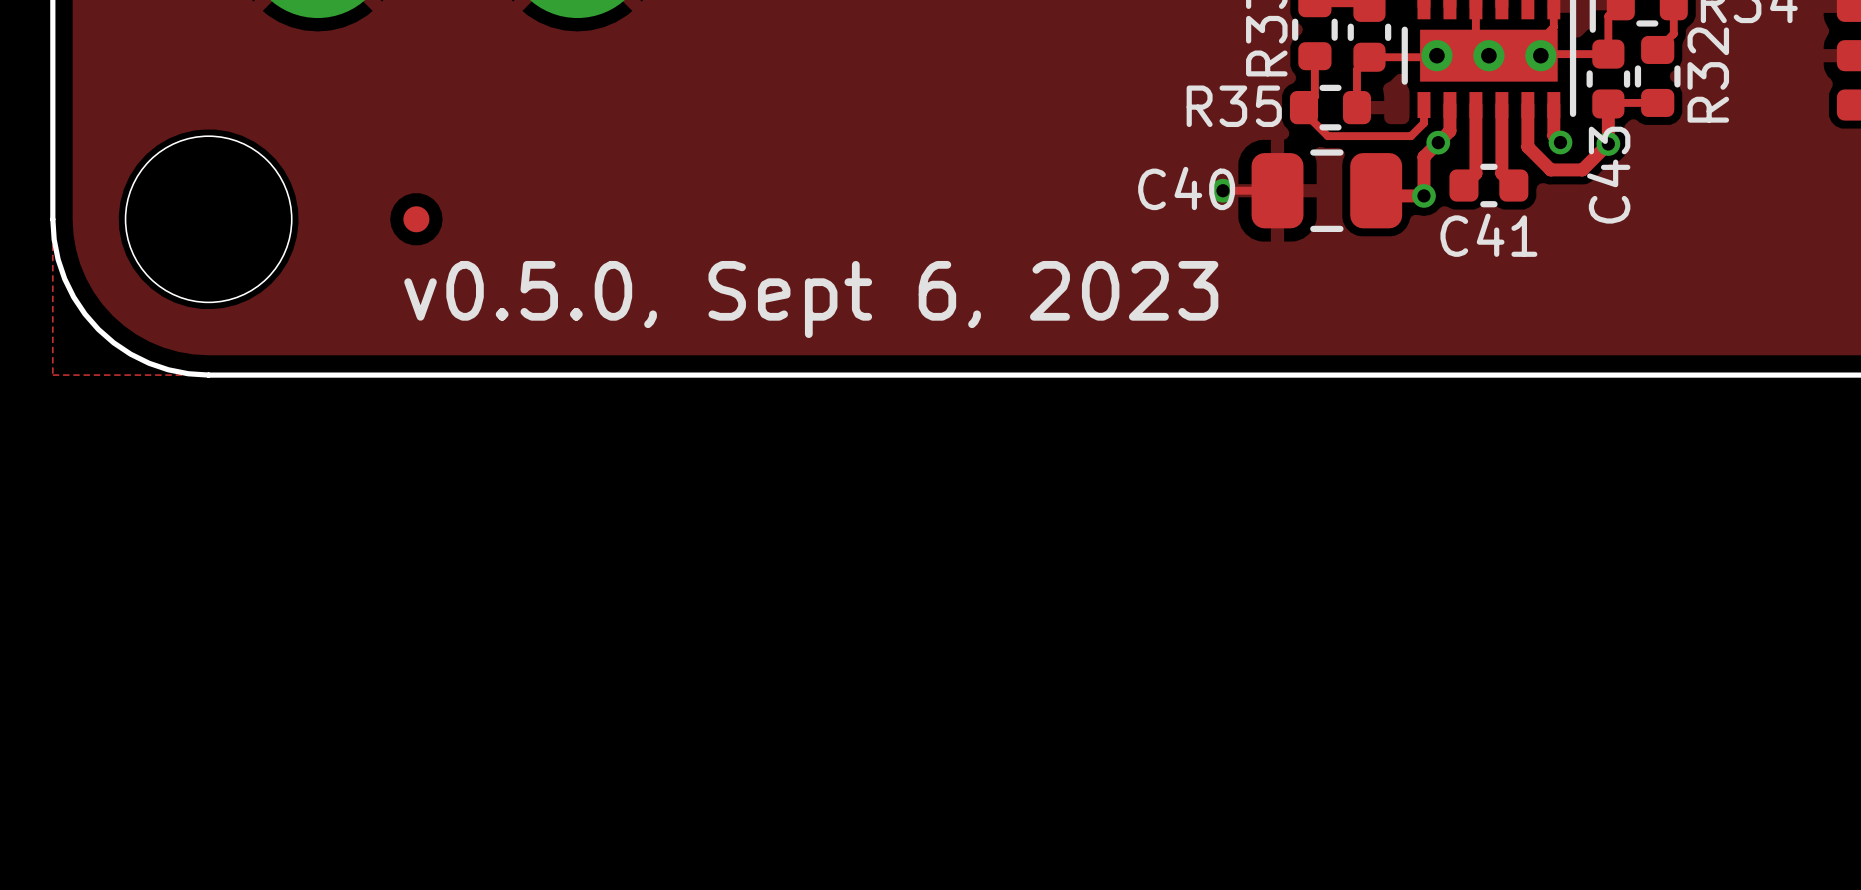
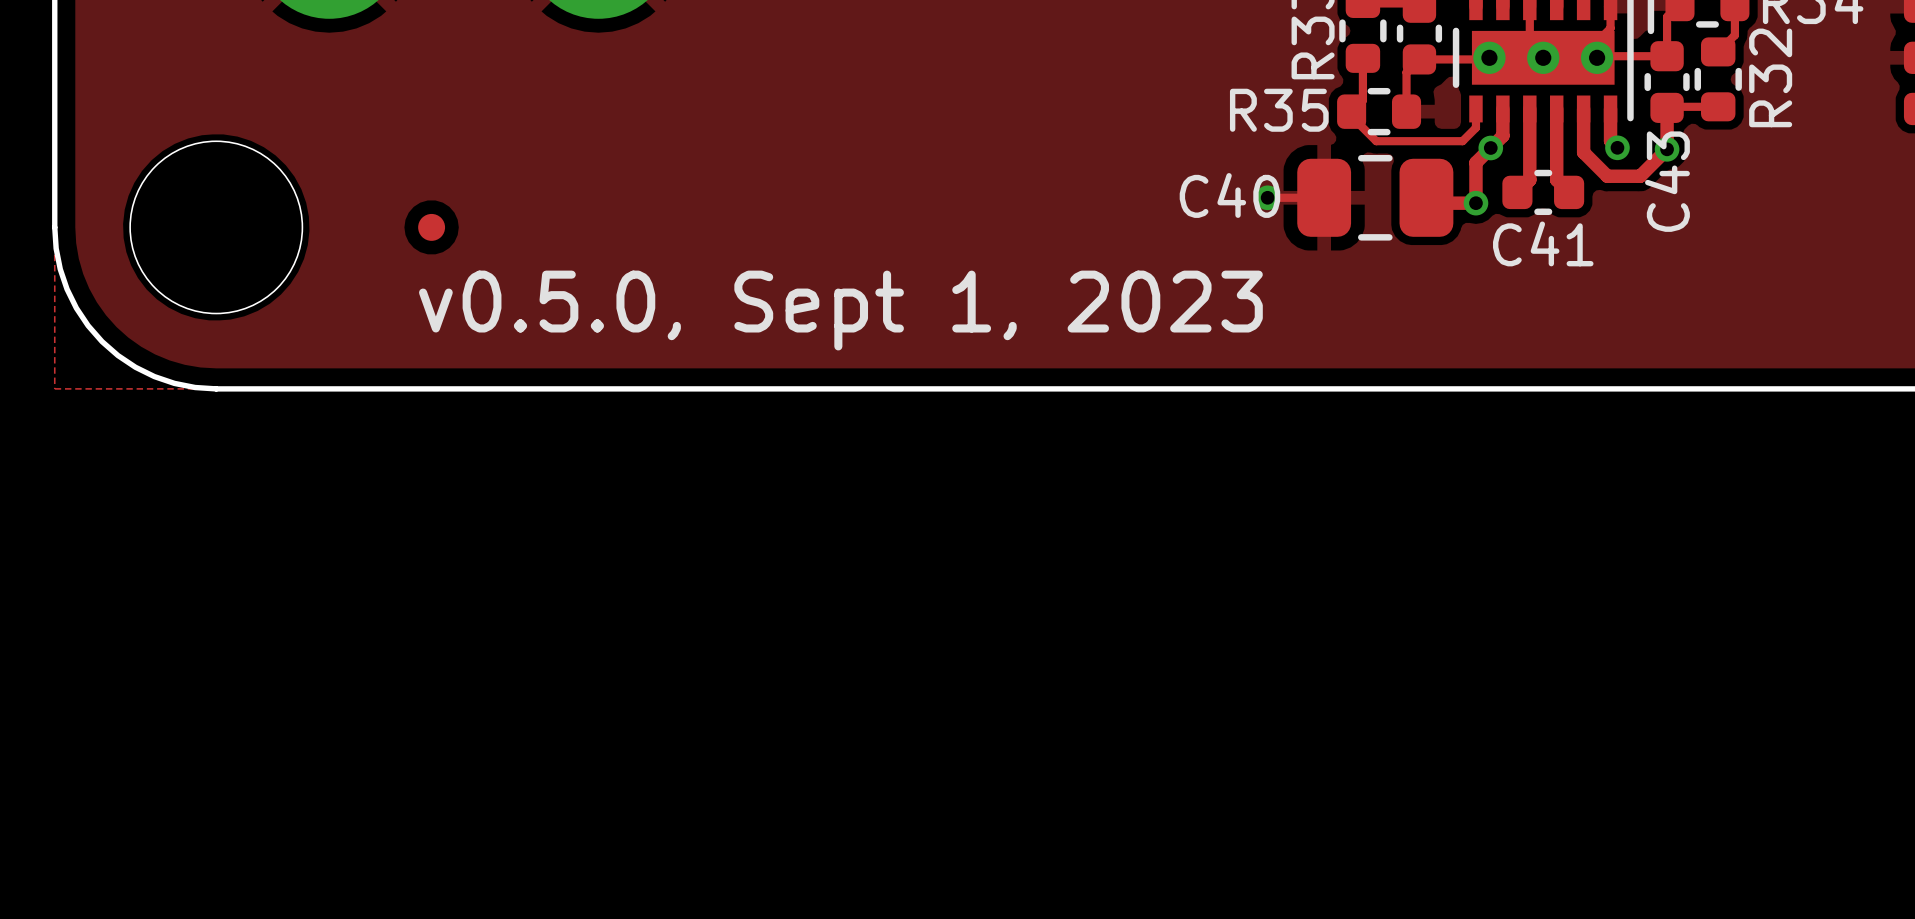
text: v0.5.0, Sept 6, 2023 (811, 299) -> v0.5.0, Sept 1, 2023 (840, 310)

